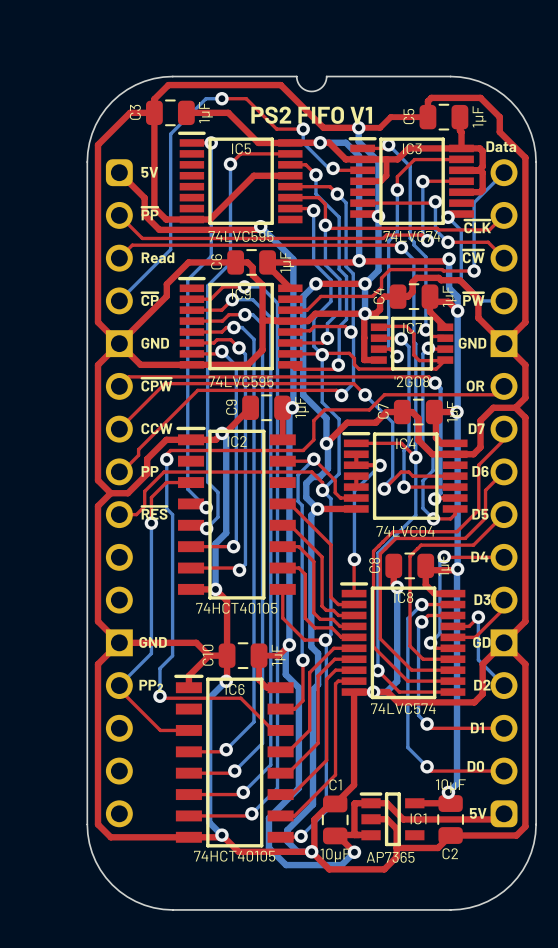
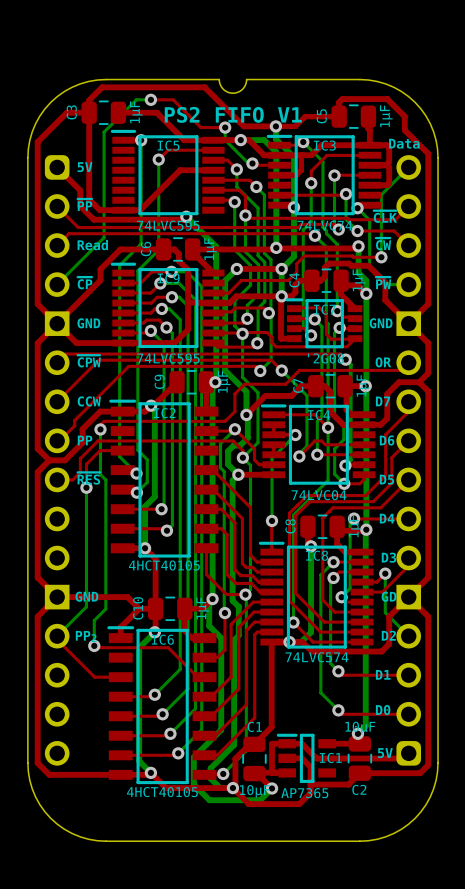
IC2 text: 74HCT40105 (236, 608) -> 4HCT40105 (164, 565)
IC6 text: 74HCT40105 (234, 856) -> 4HCT40105 (162, 792)

